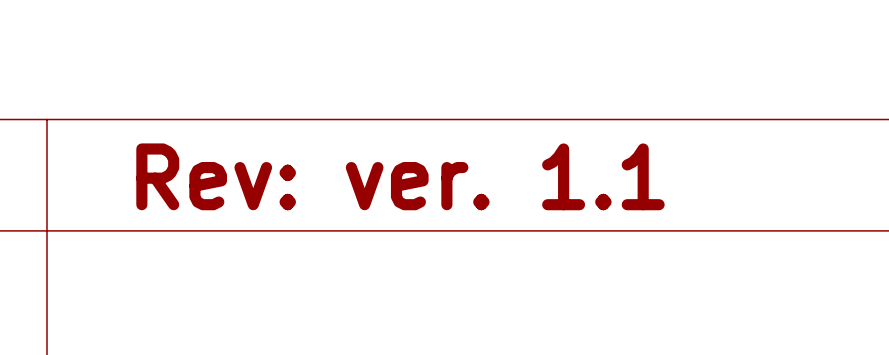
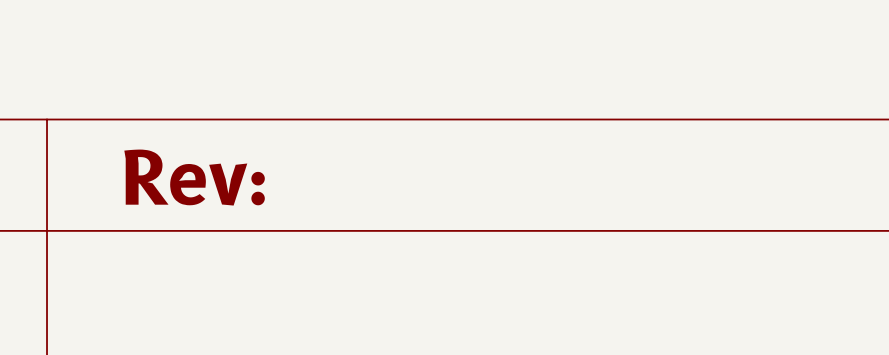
title block: Rev: ver. 1.1 (400, 176) -> Rev: (194, 177)

